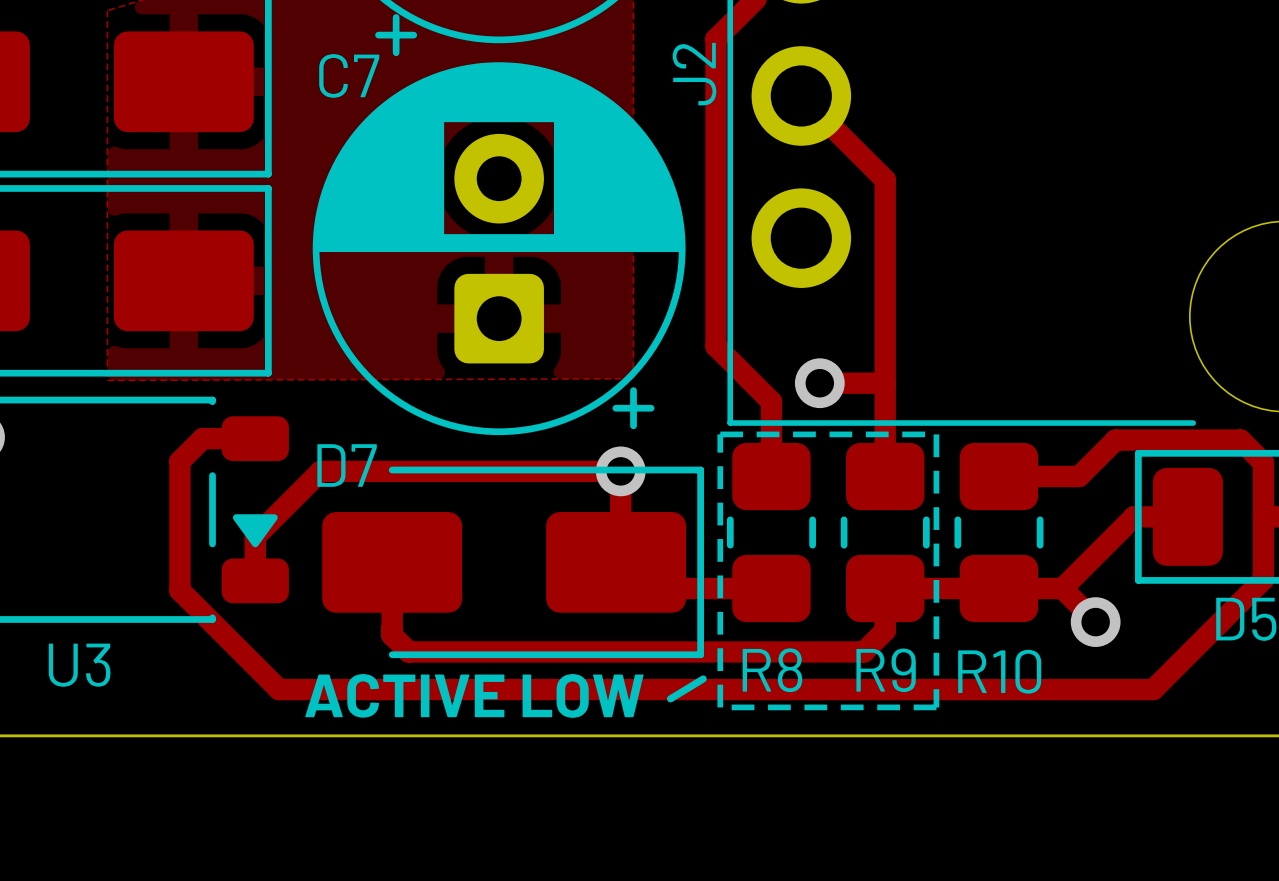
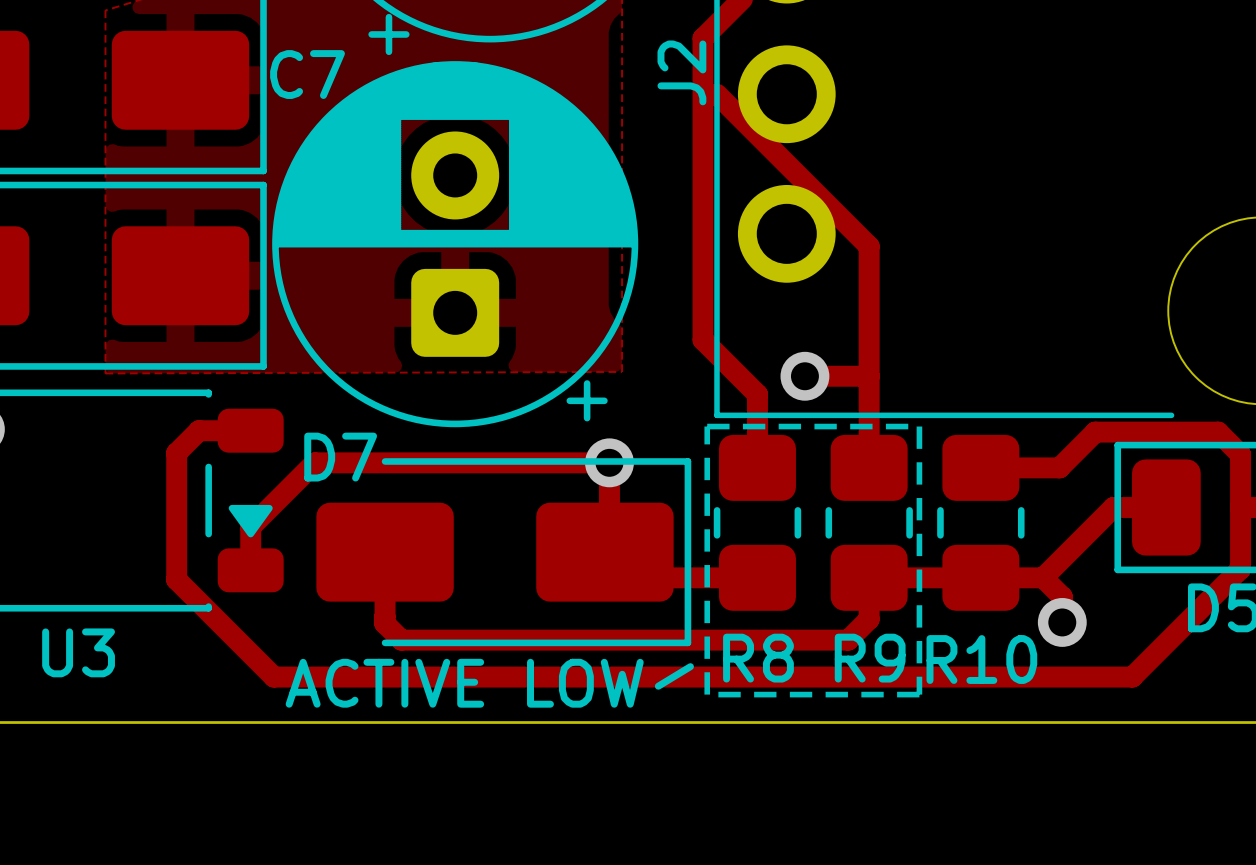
track: (801, 95) (885, 179) (885, 250) -> (716, 94) (869, 246)
C7 position: (499, 248) -> (455, 244)
via position: (1095, 622) -> (1062, 622)

